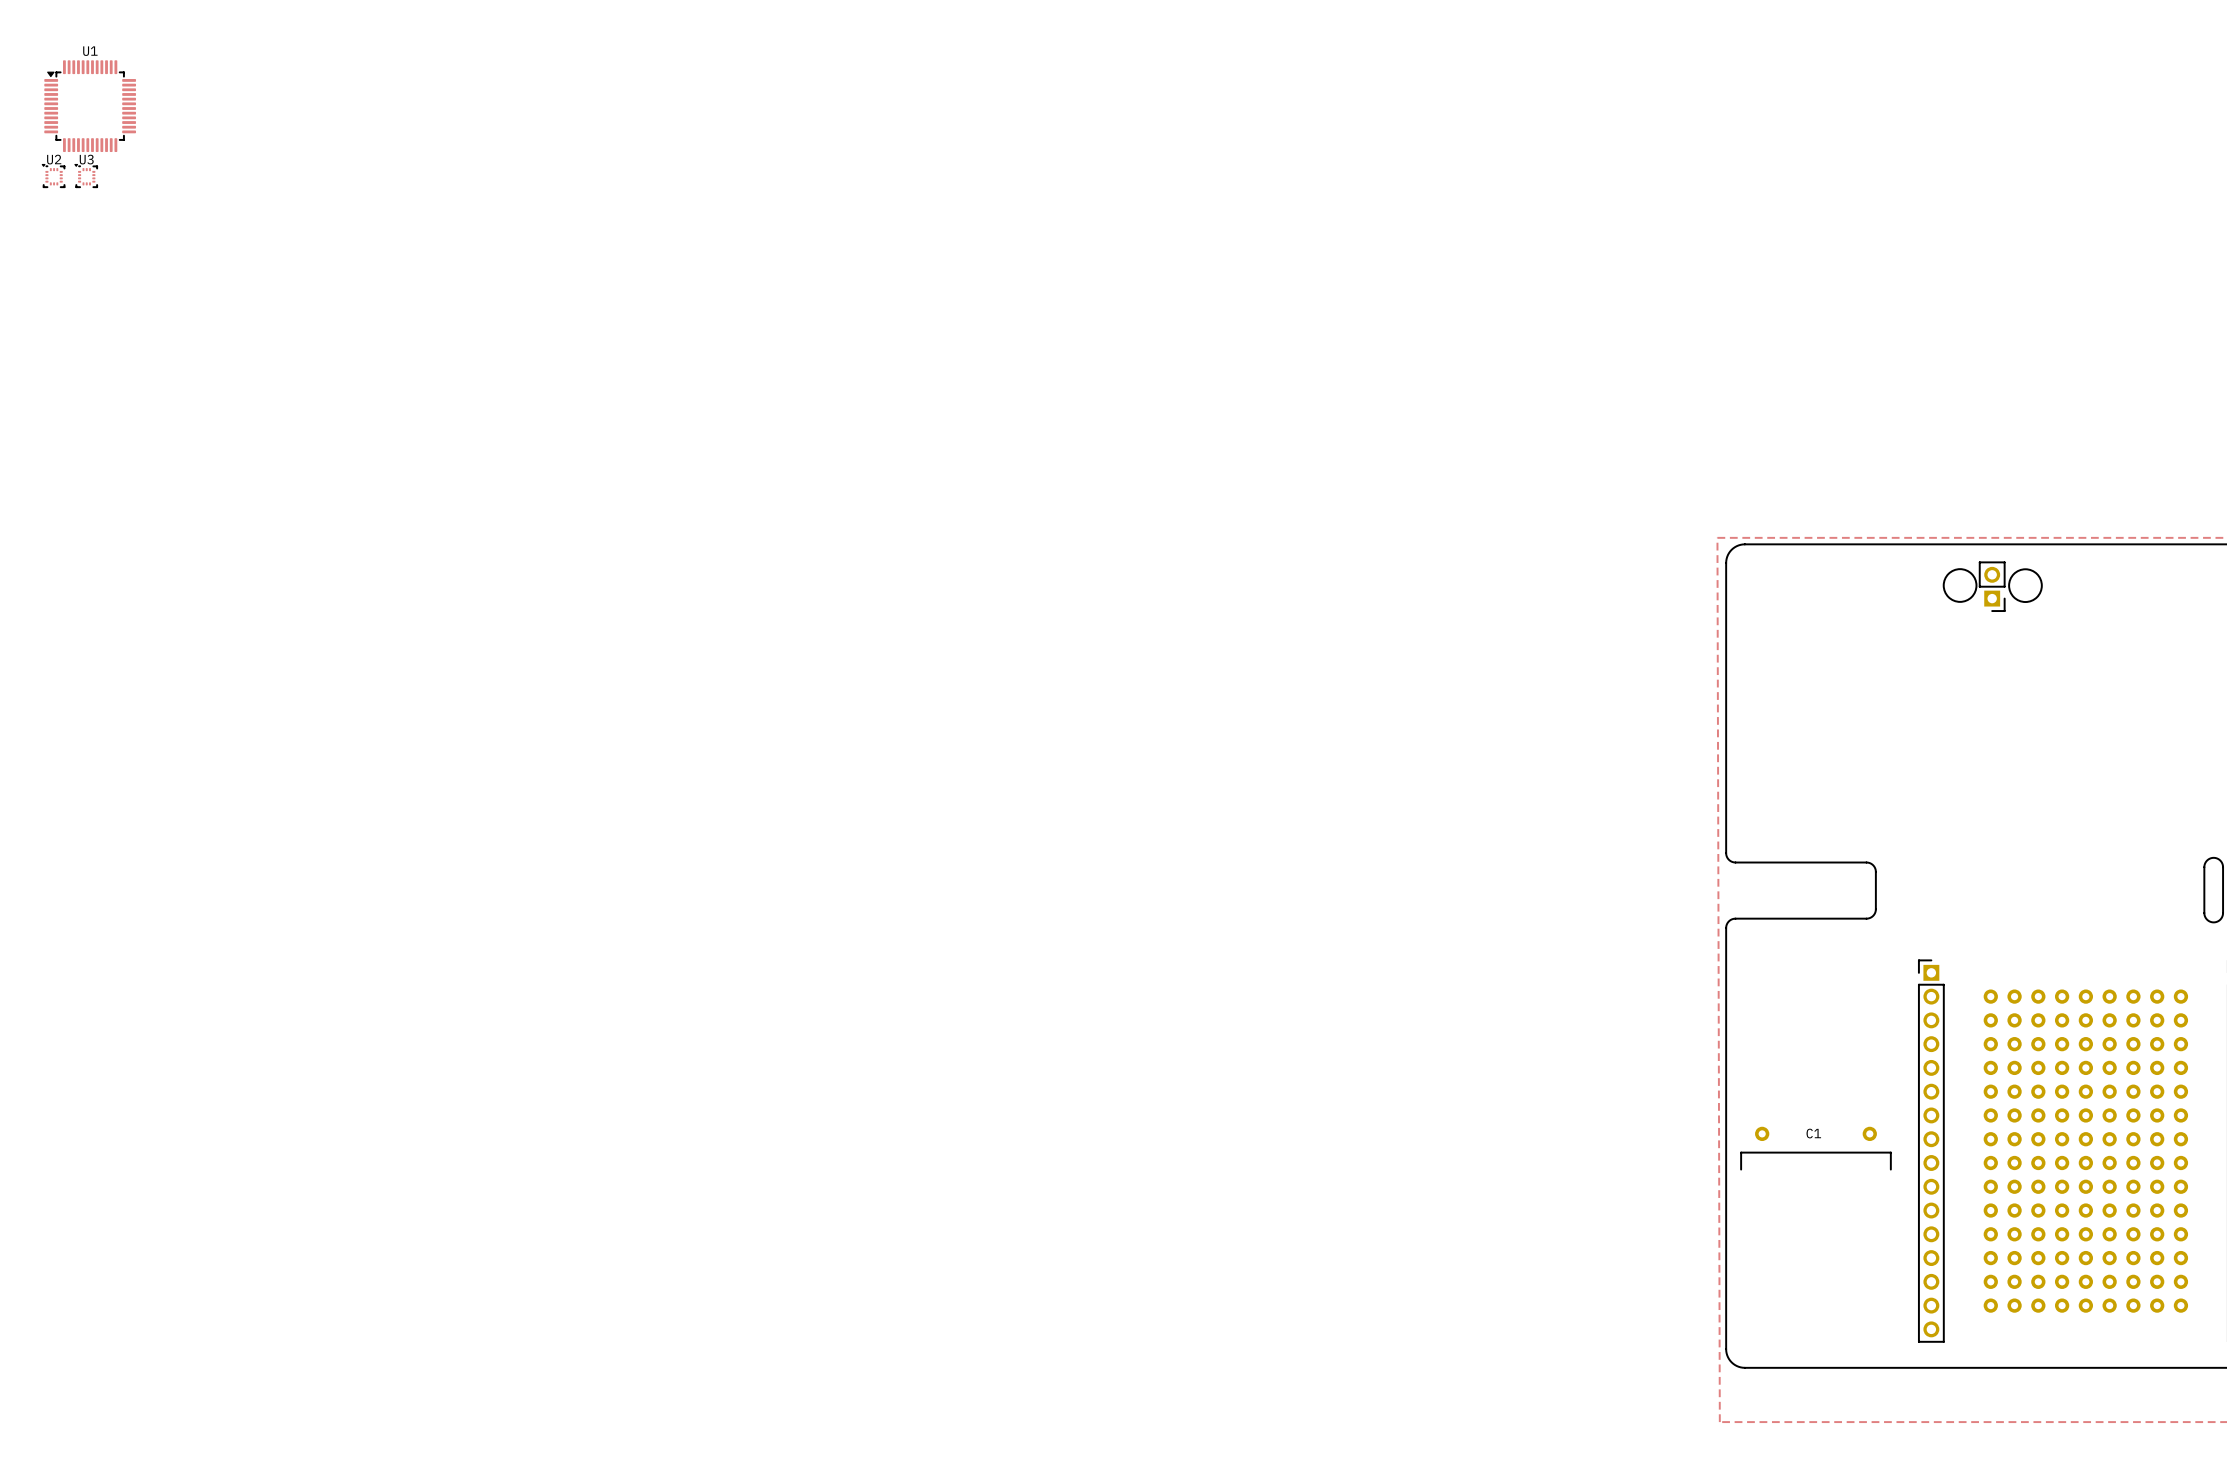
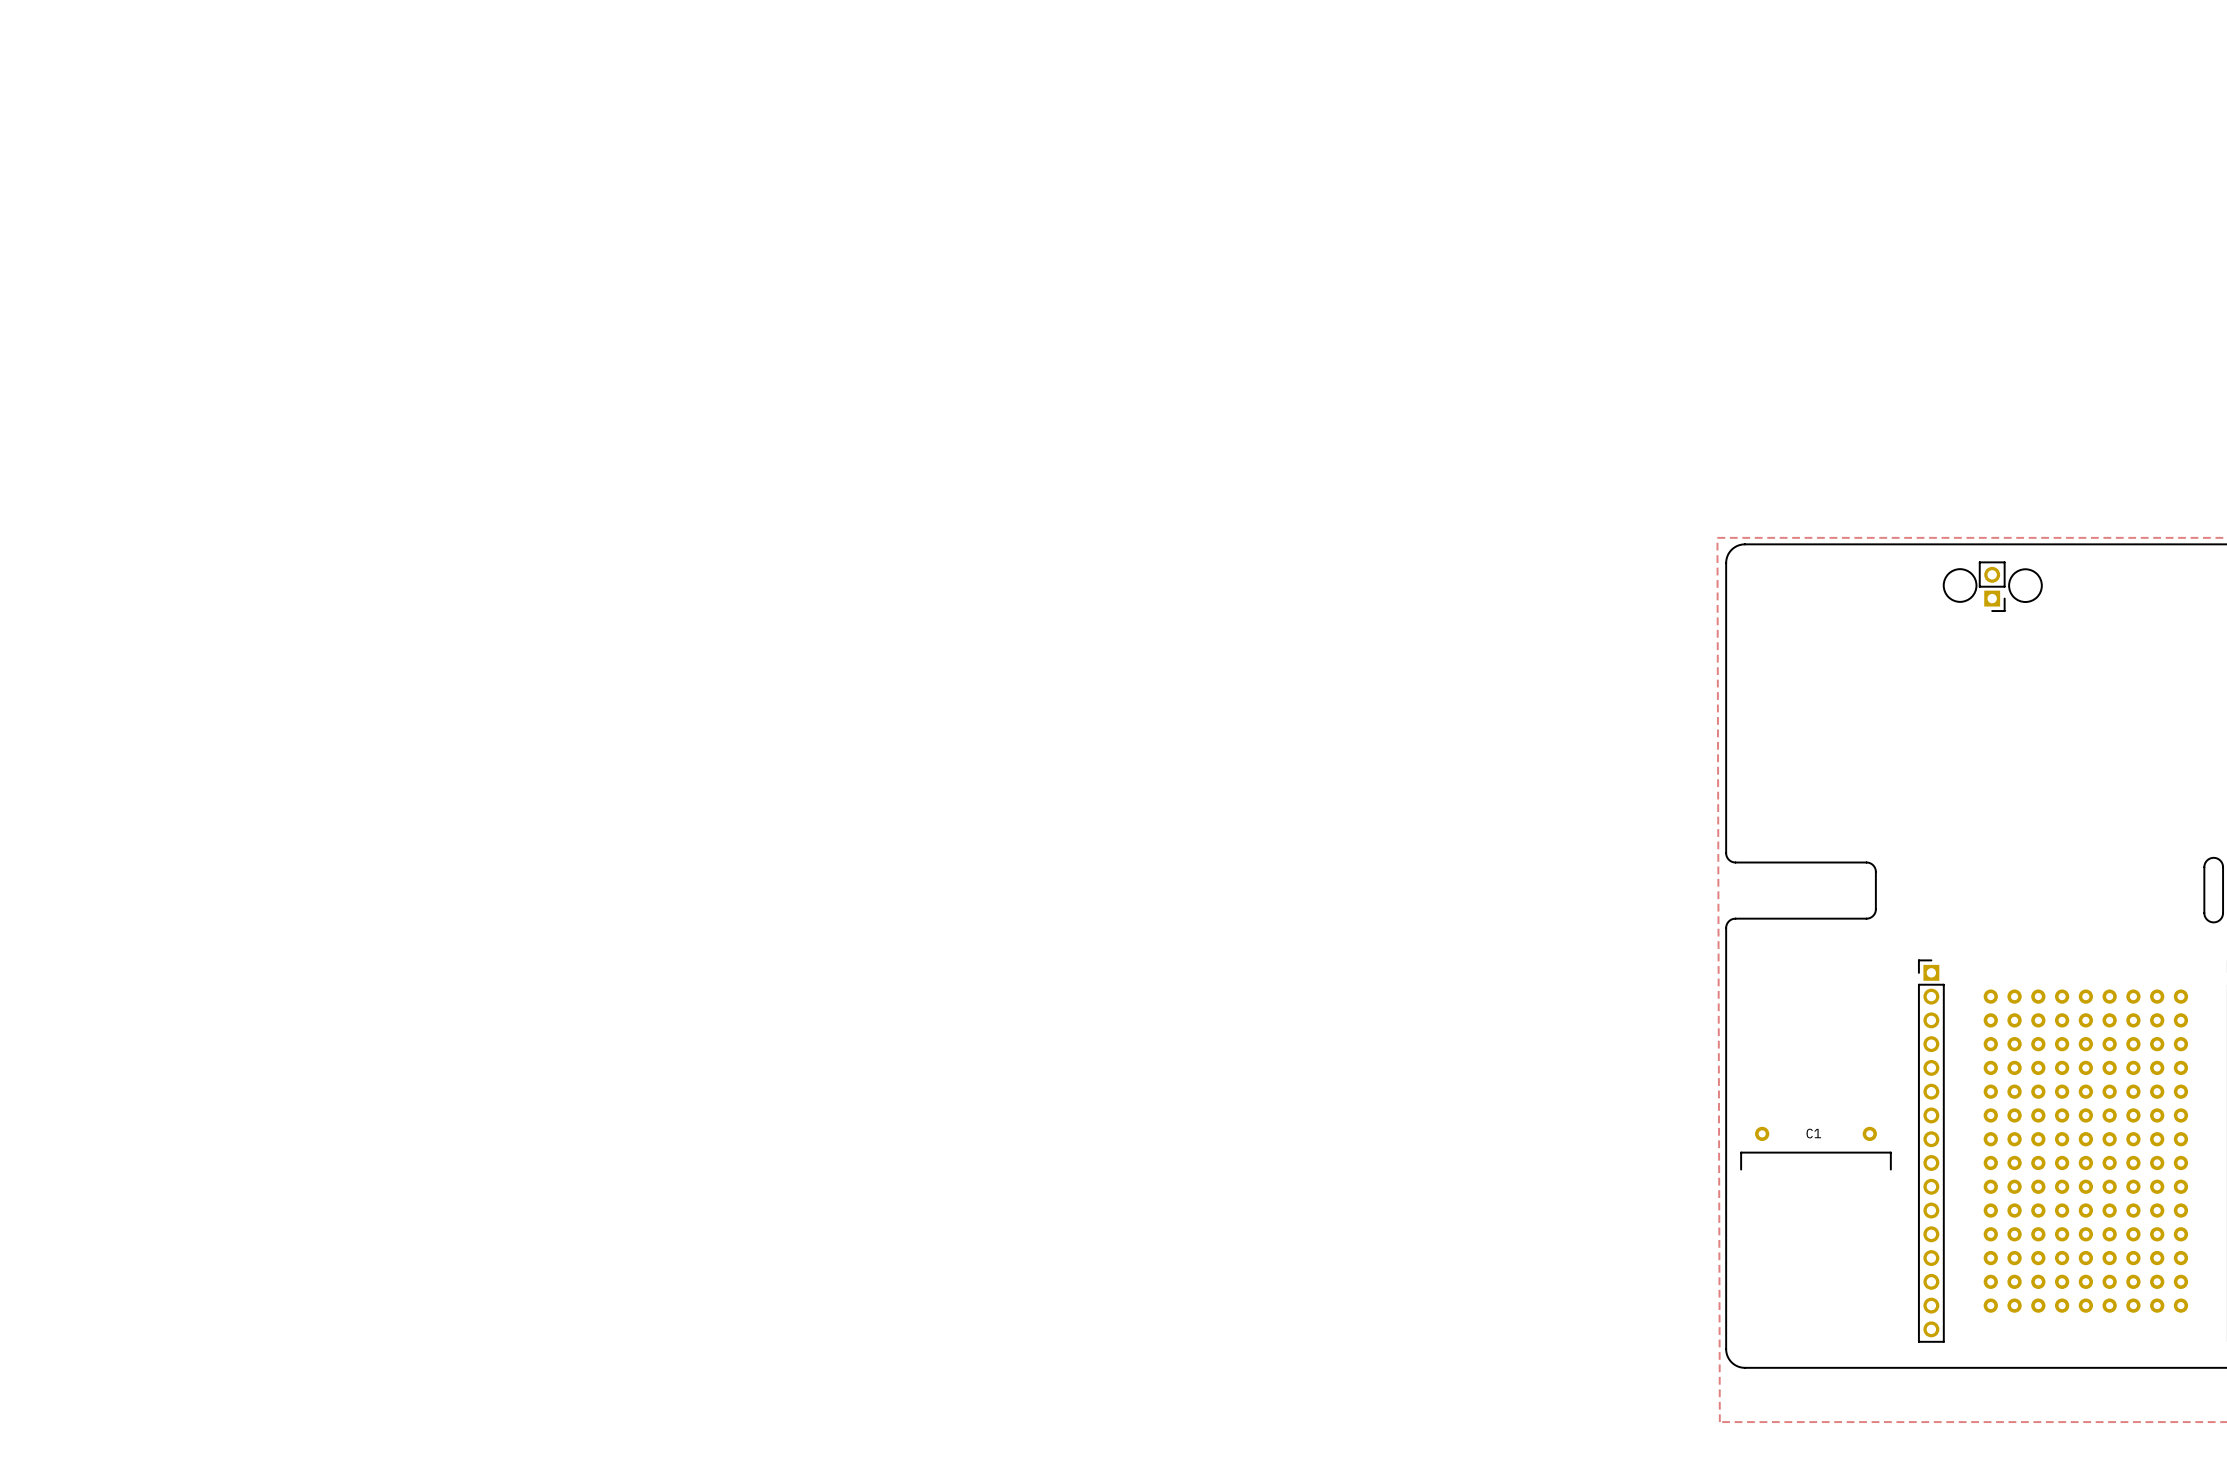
U1: (90, 106) -> none
U2: (53, 175) -> none
U3: (86, 175) -> none

